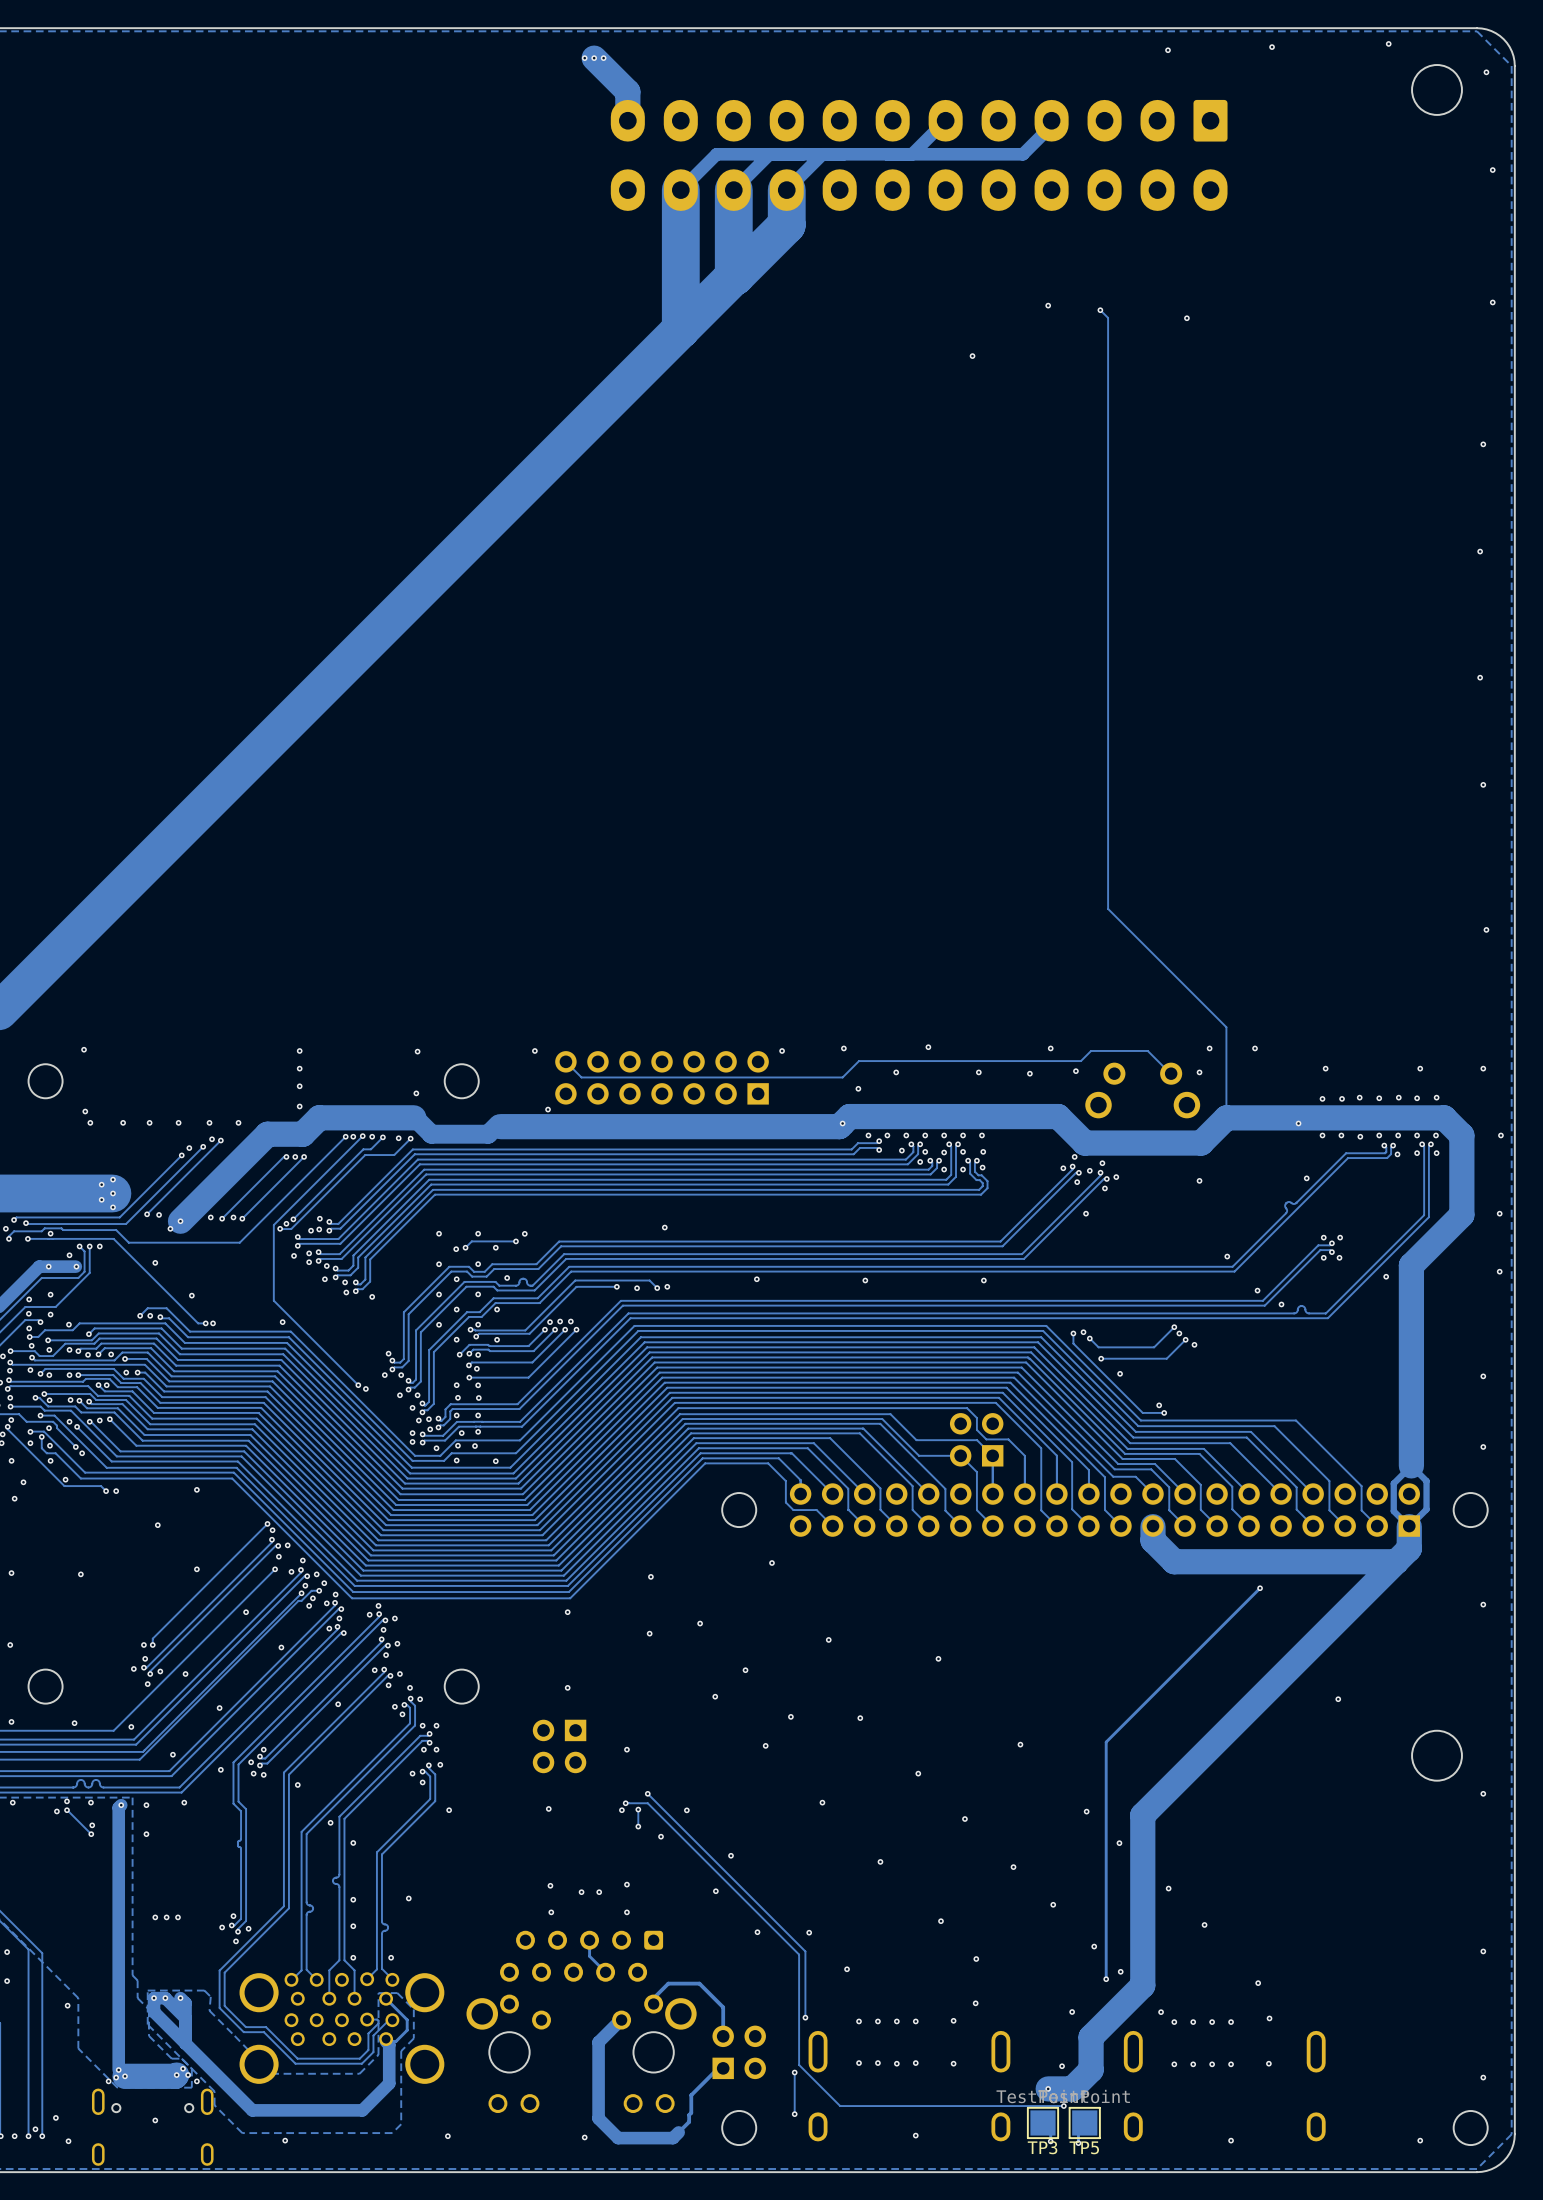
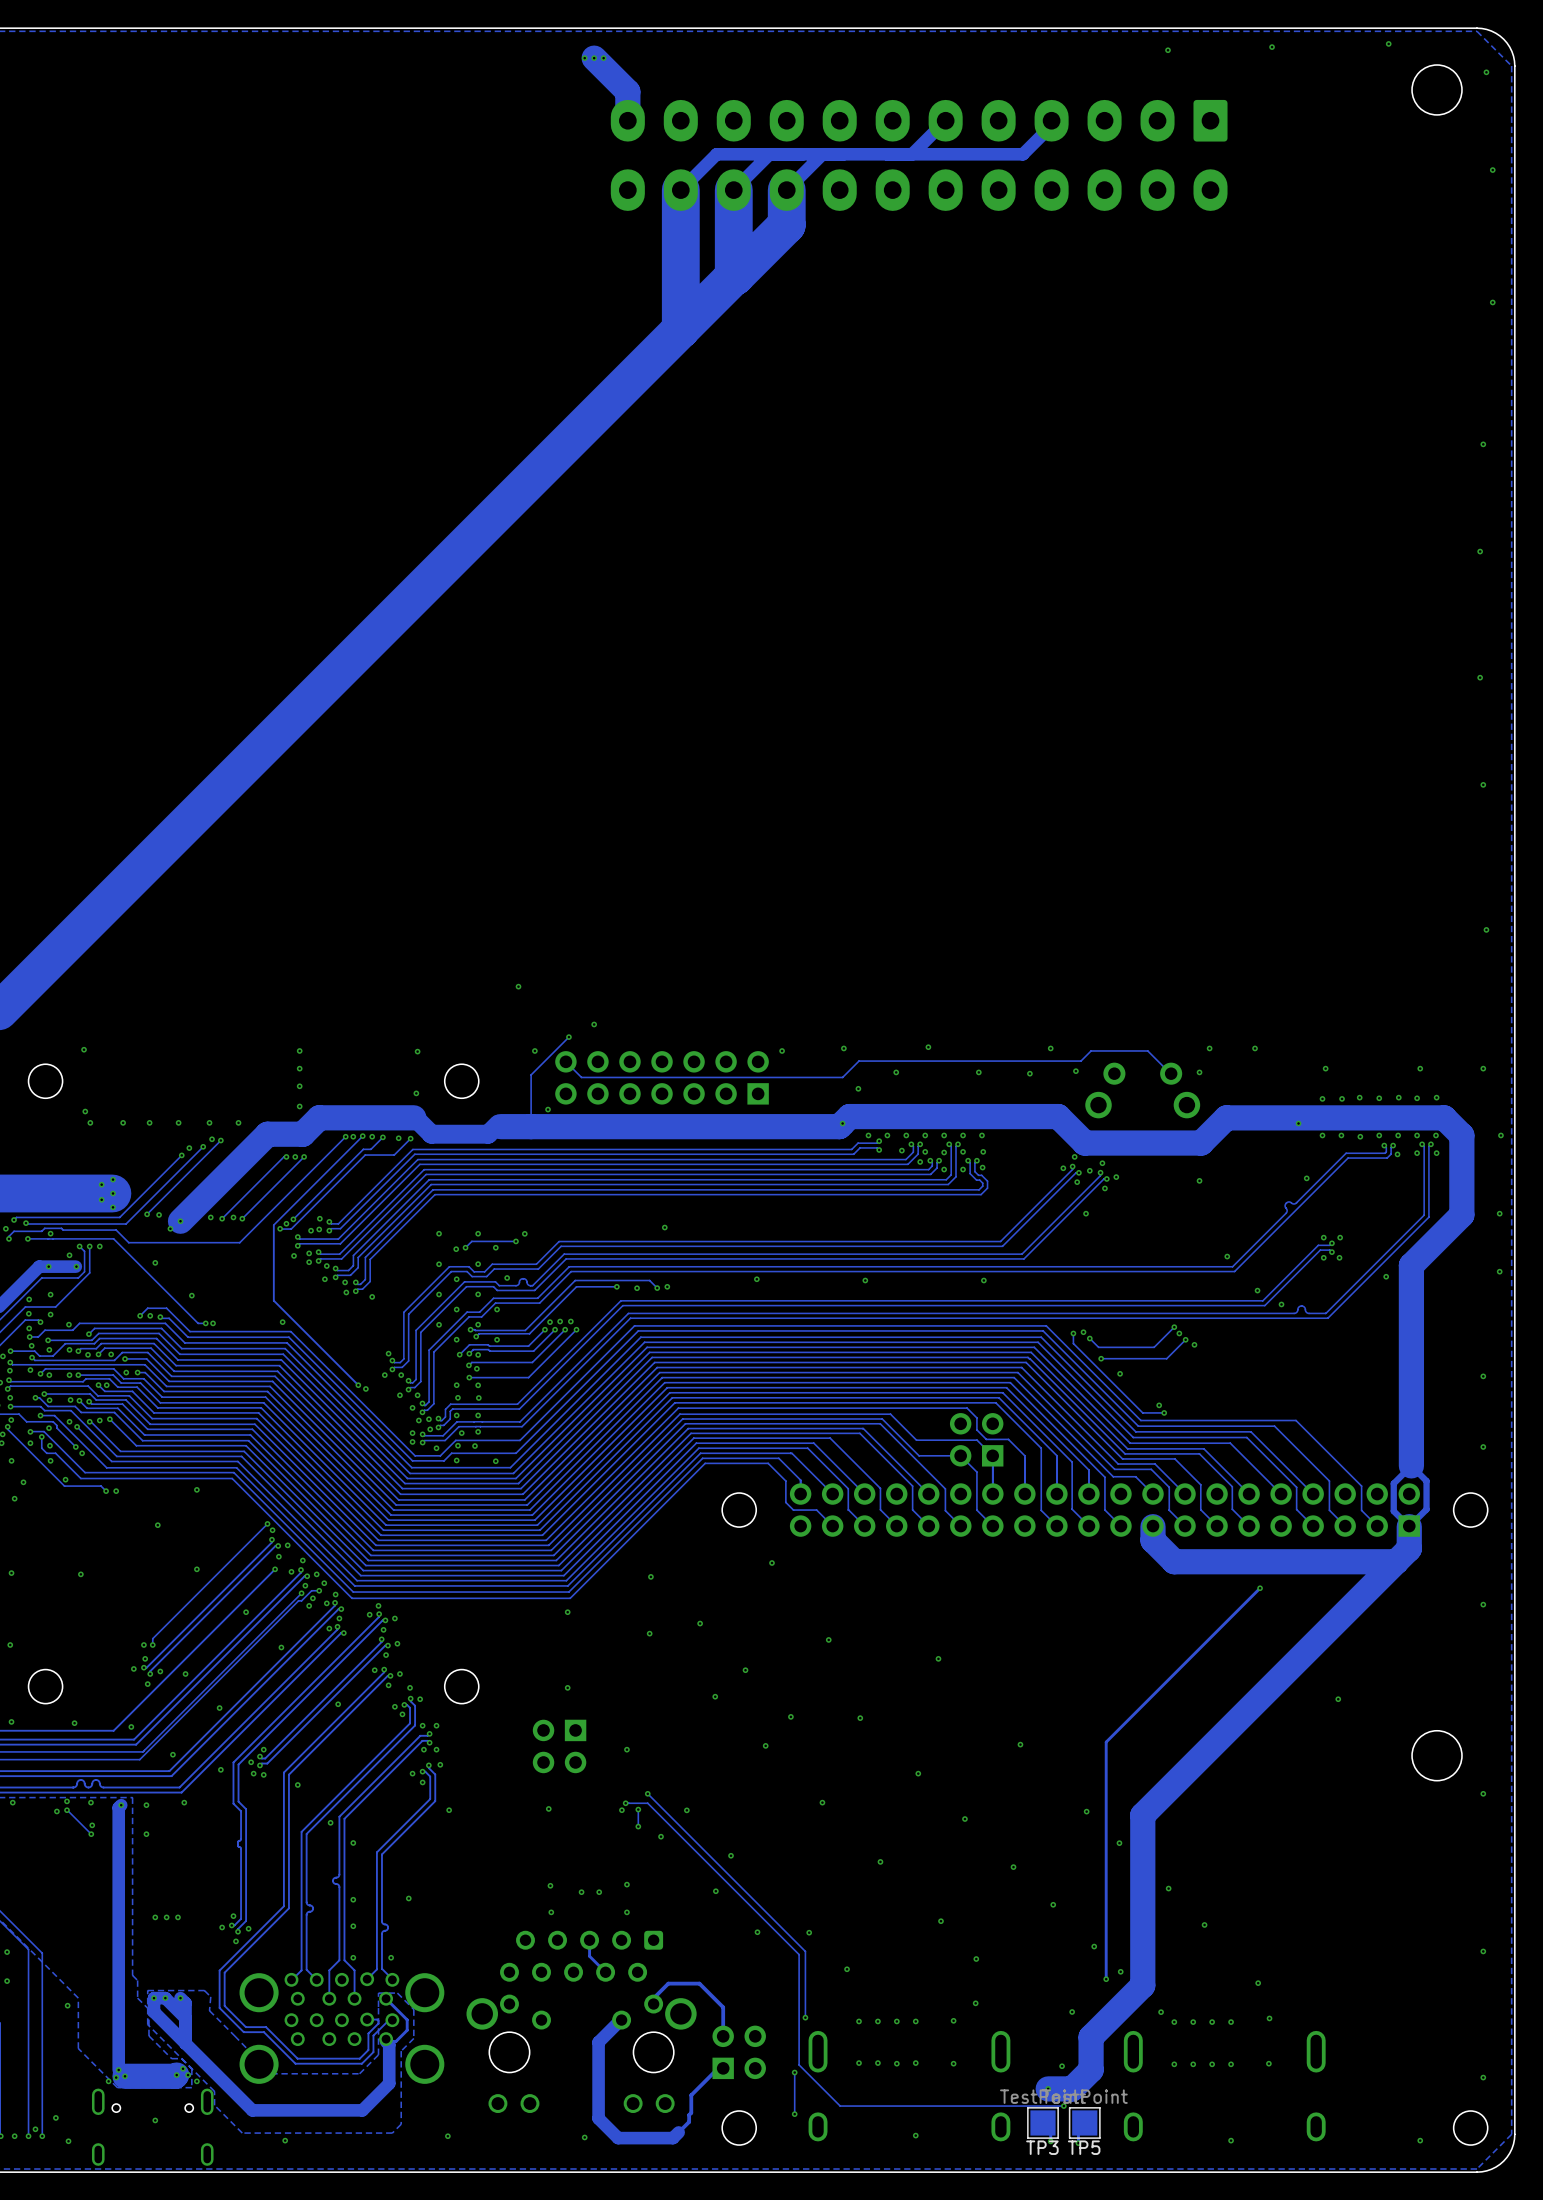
via: (1048, 305) -> none
track: (1100, 310) (1108, 317) (1108, 908) (1226, 1027) (1226, 1117) -> none
via: (1100, 310) -> none
via: (1186, 318) -> none
via: (972, 356) -> none
via: none -> (518, 986)
via: none -> (594, 1024)
track: none -> (568, 1037) (531, 1074) (531, 1126)
via: none -> (568, 1037)

